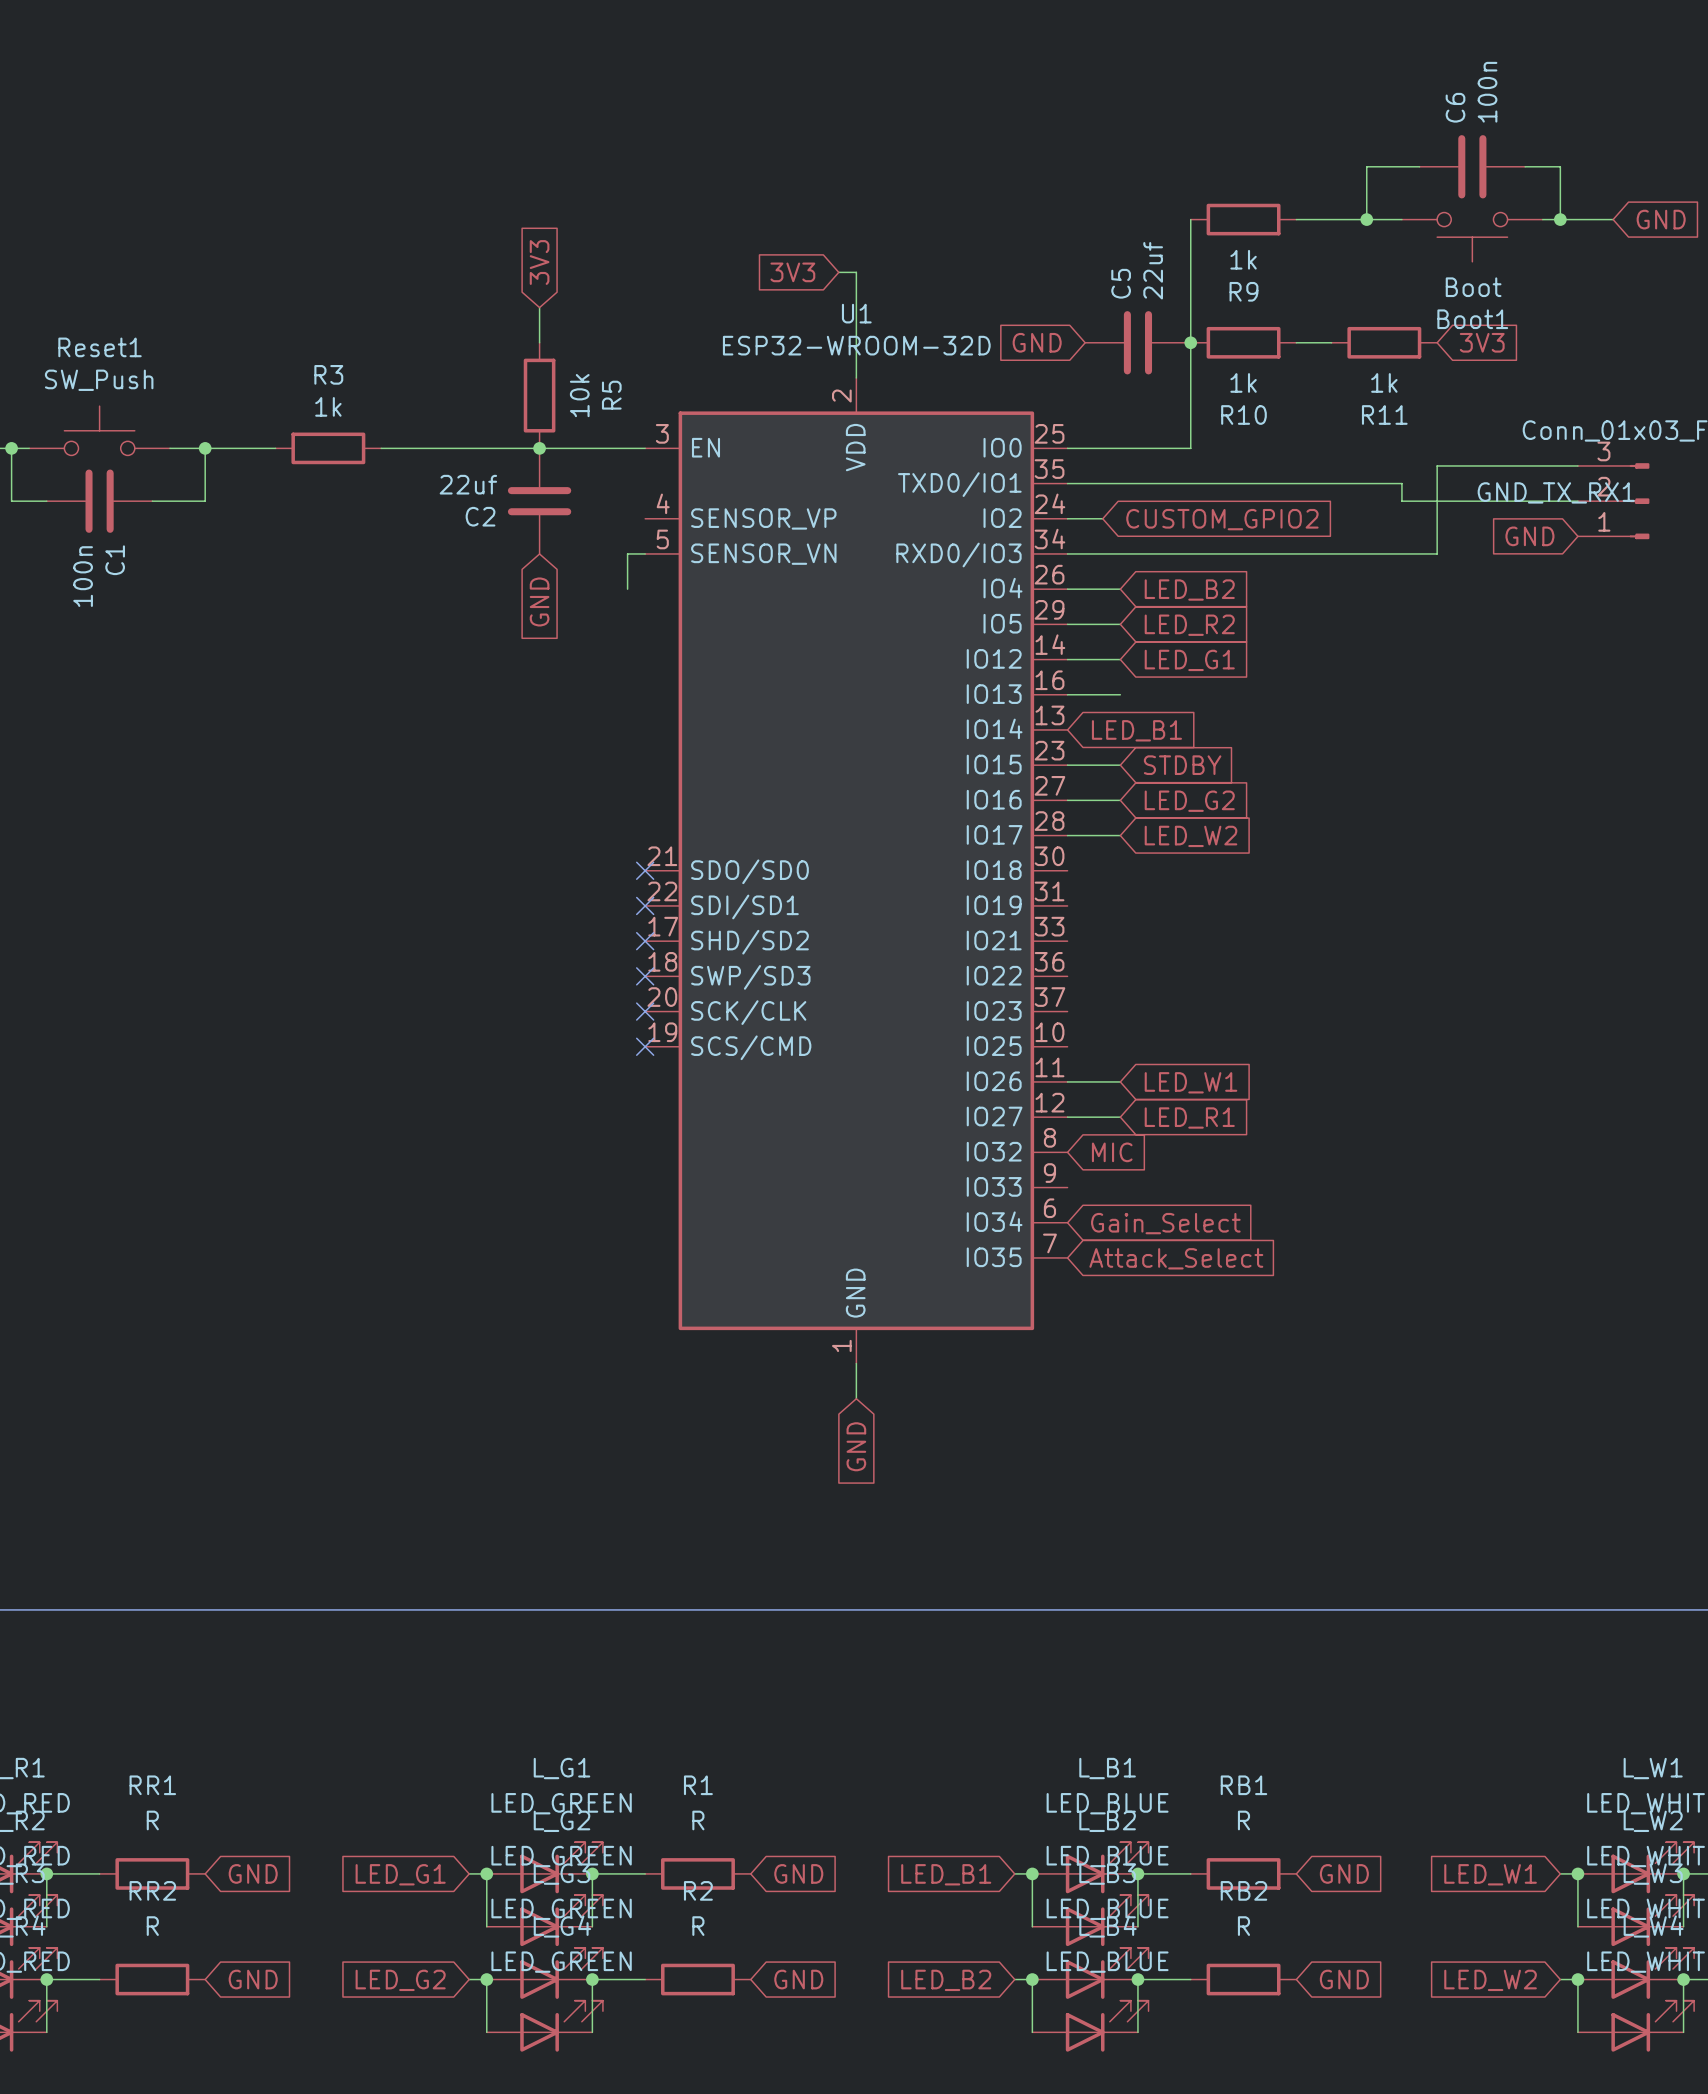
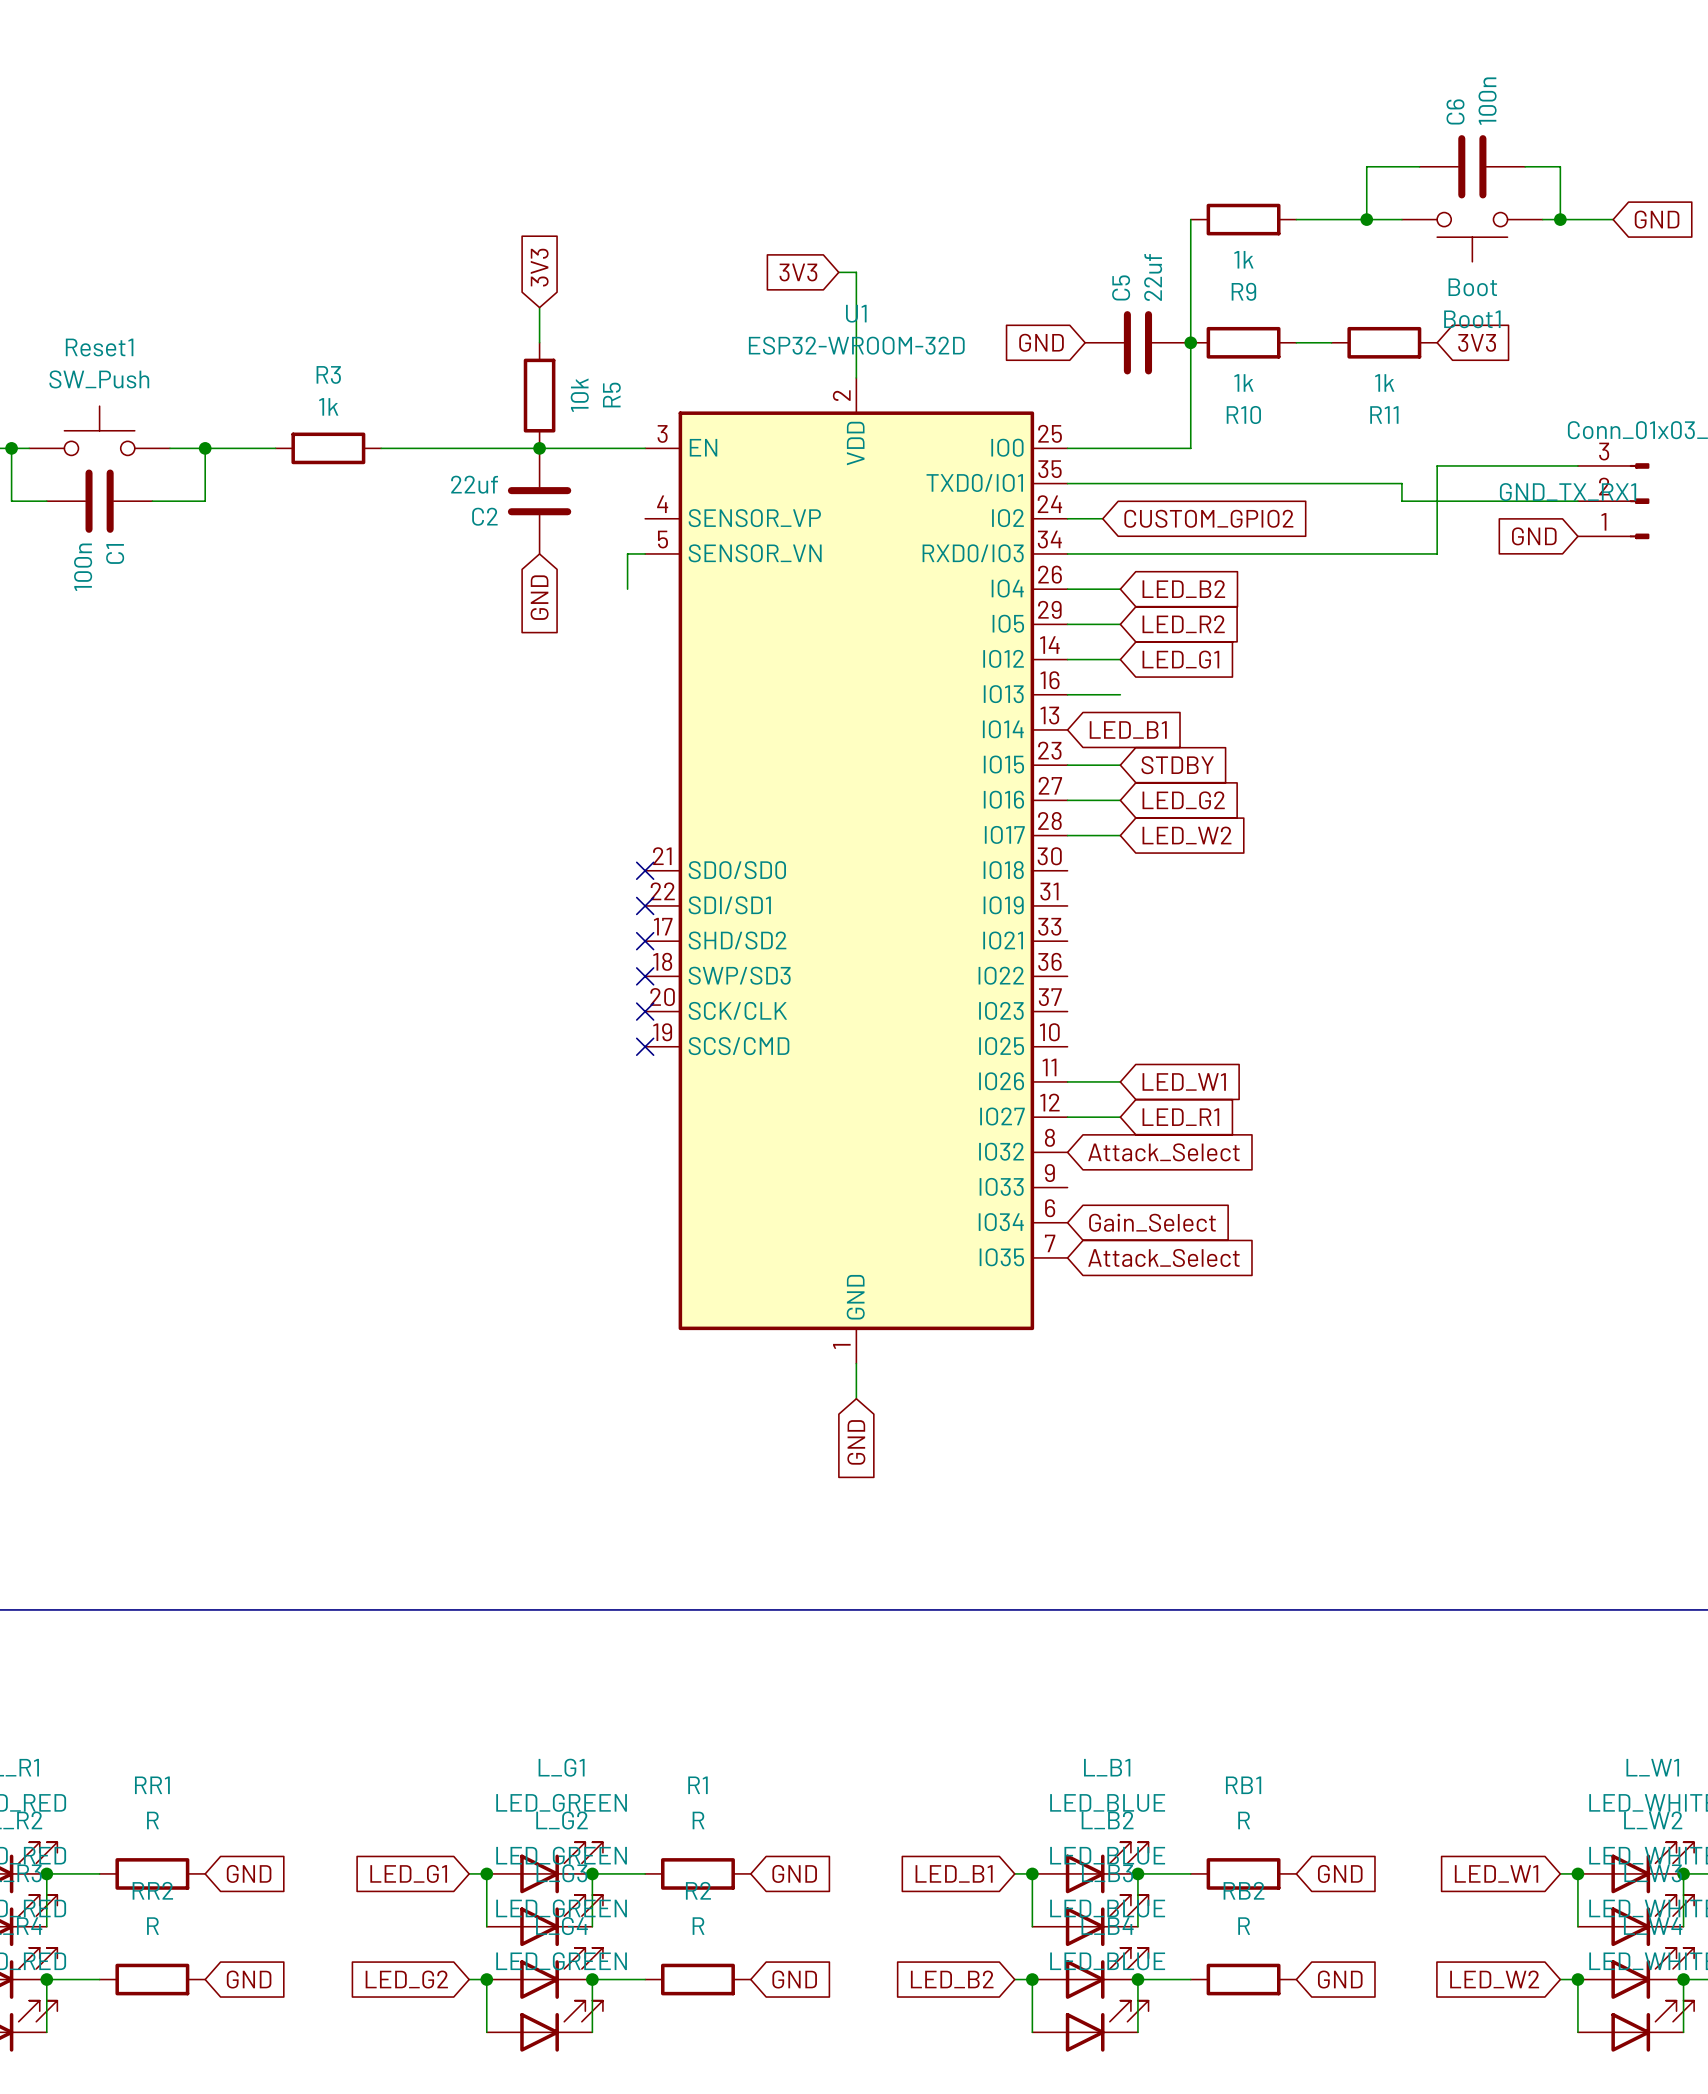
global label: MIC (1112, 1152) -> Attack_Select (1163, 1152)

